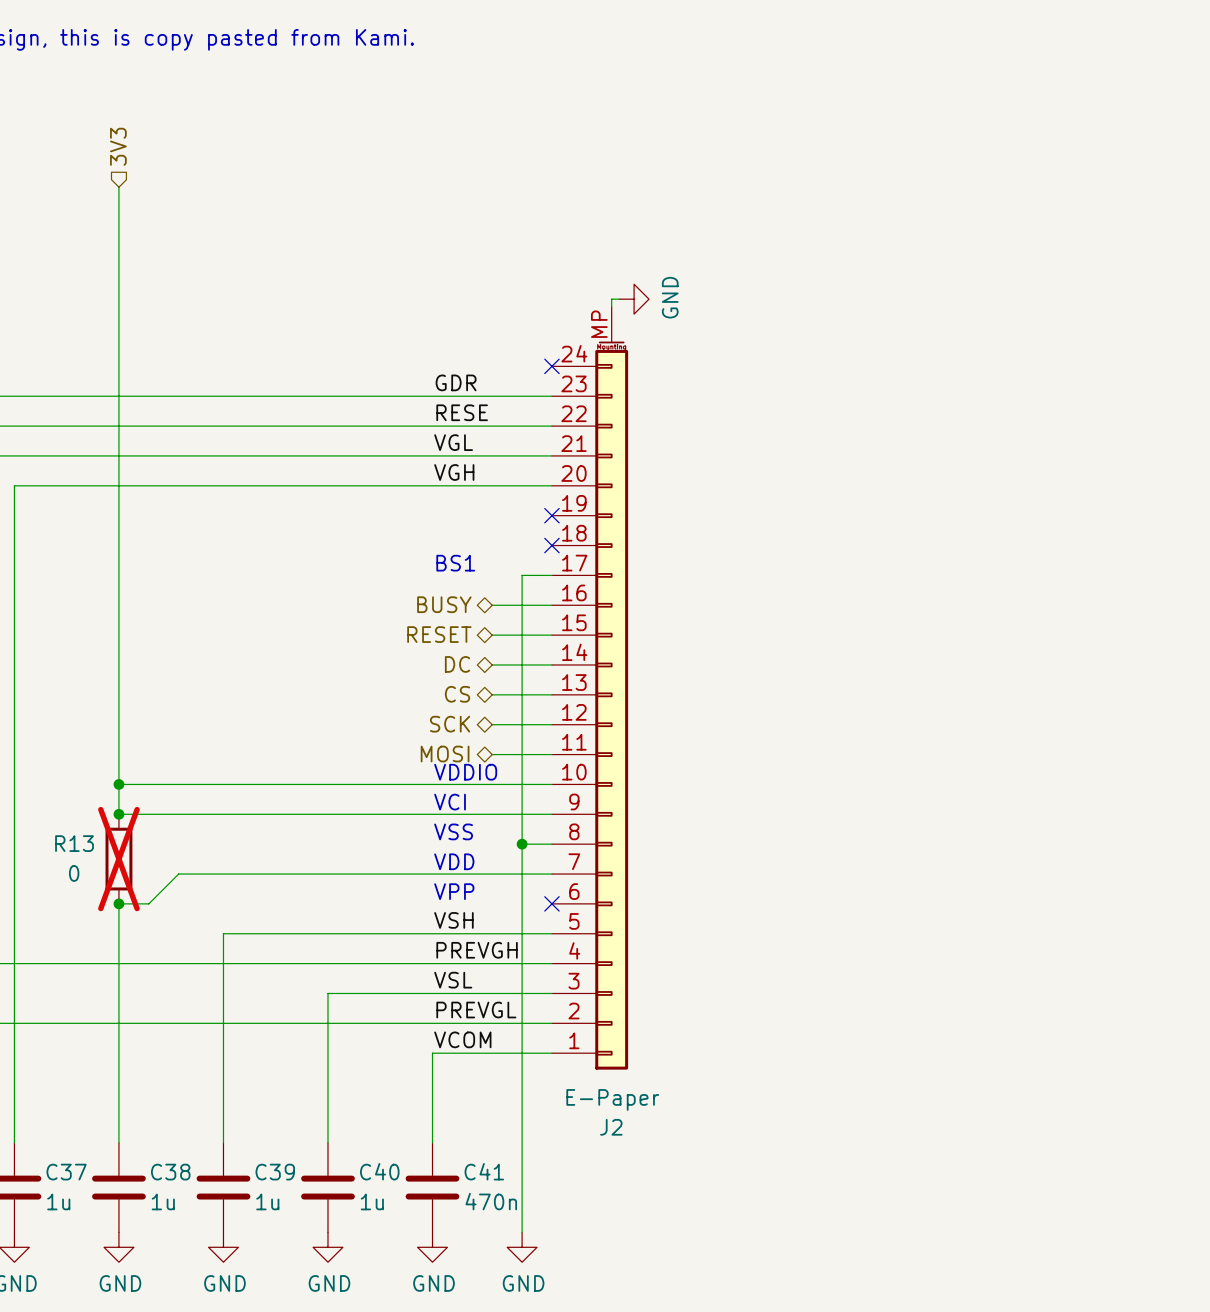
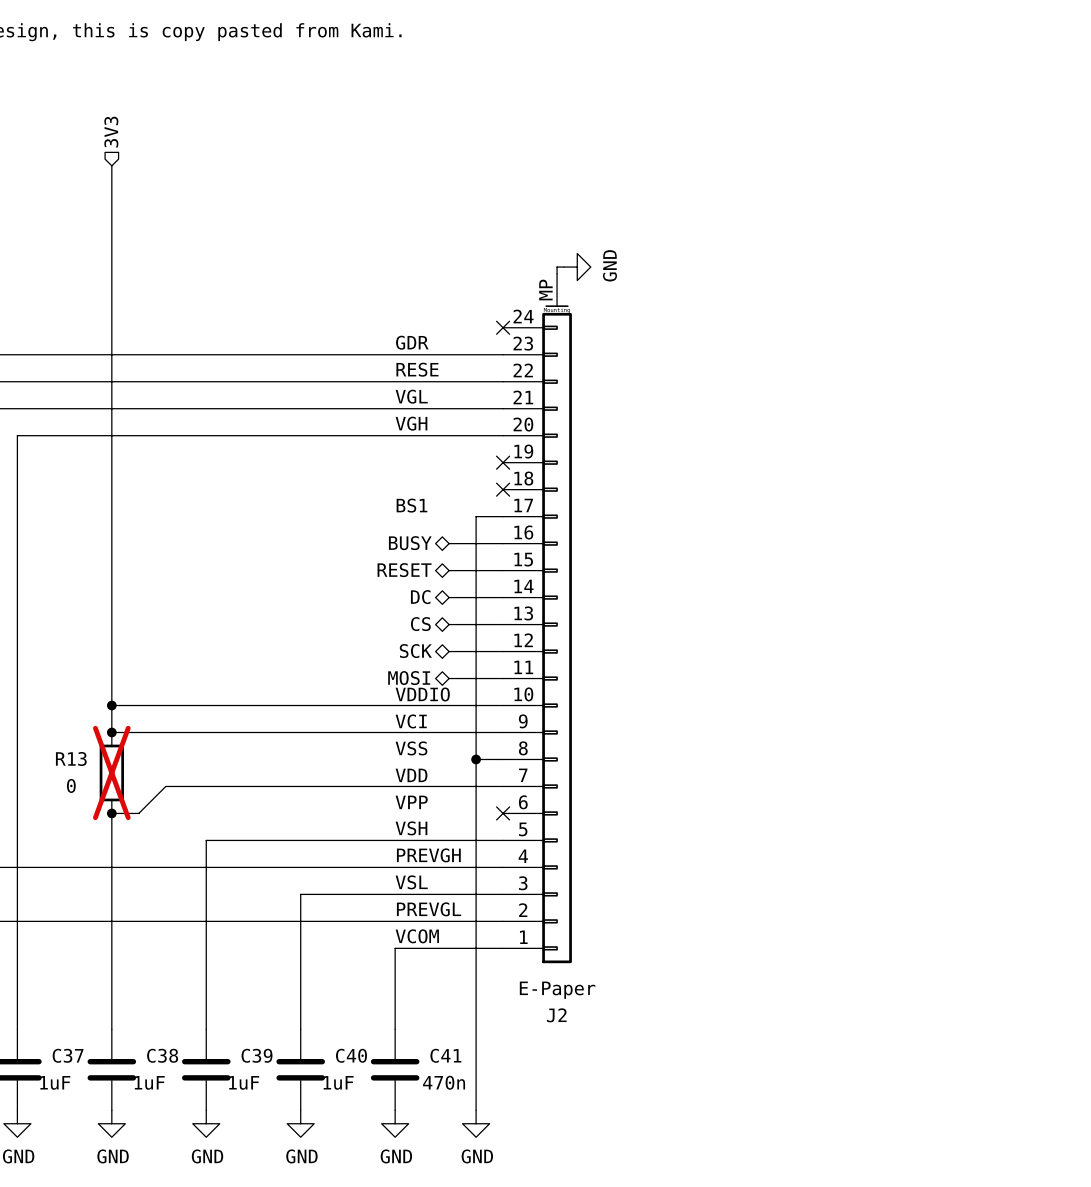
C37 value: 1u (58, 1201) -> 1uF (55, 1082)
C38 value: 1u (163, 1201) -> 1uF (149, 1082)
C39 value: 1u (267, 1201) -> 1uF (244, 1082)
C40 value: 1u (372, 1201) -> 1uF (338, 1082)

